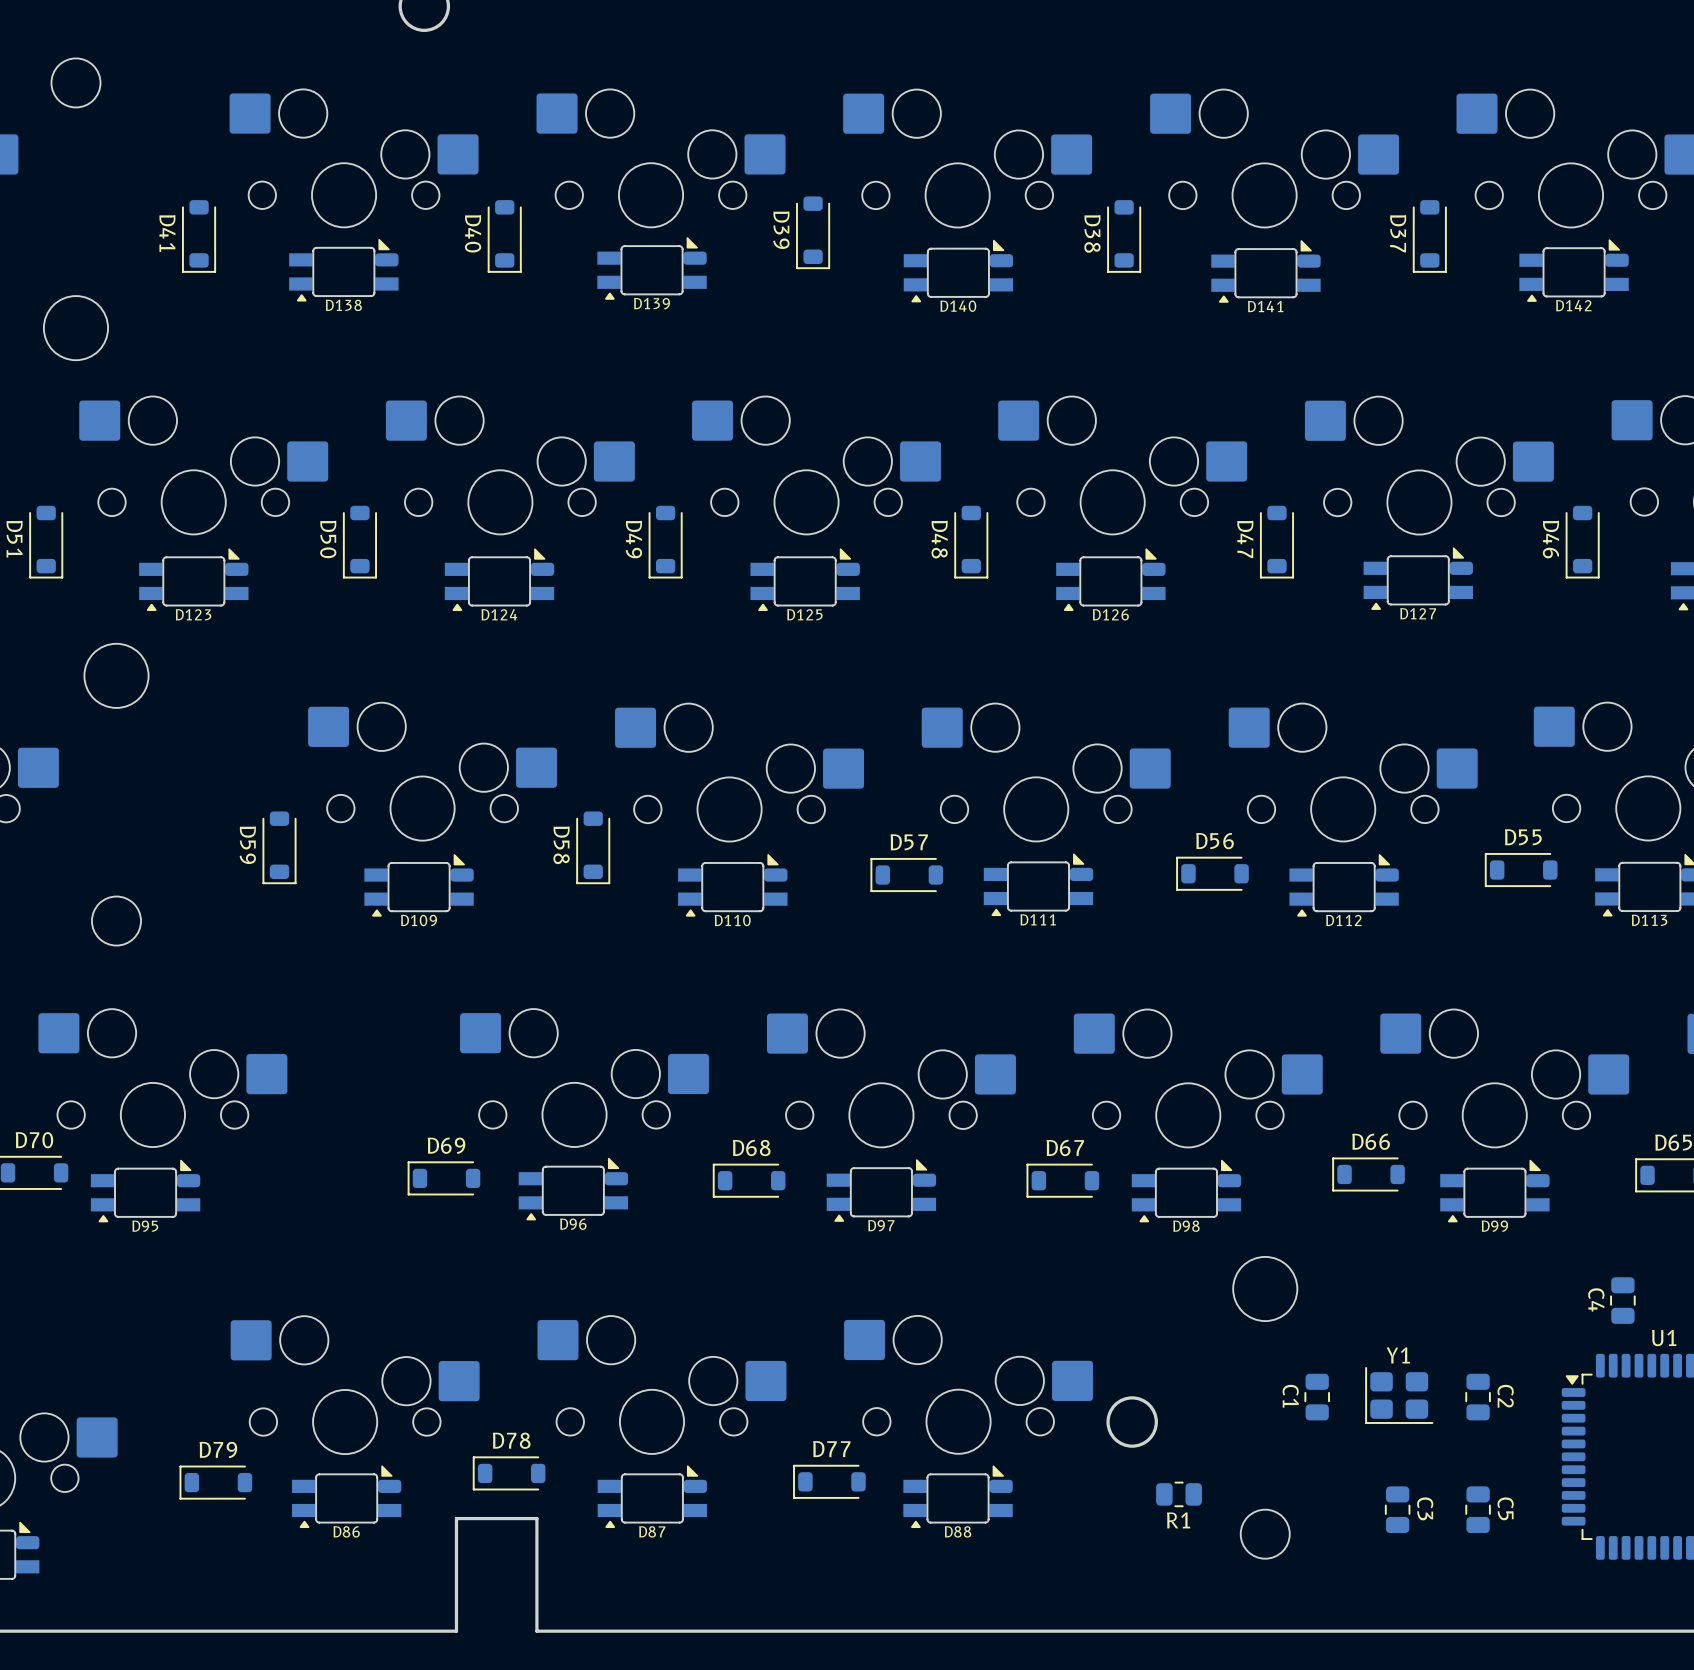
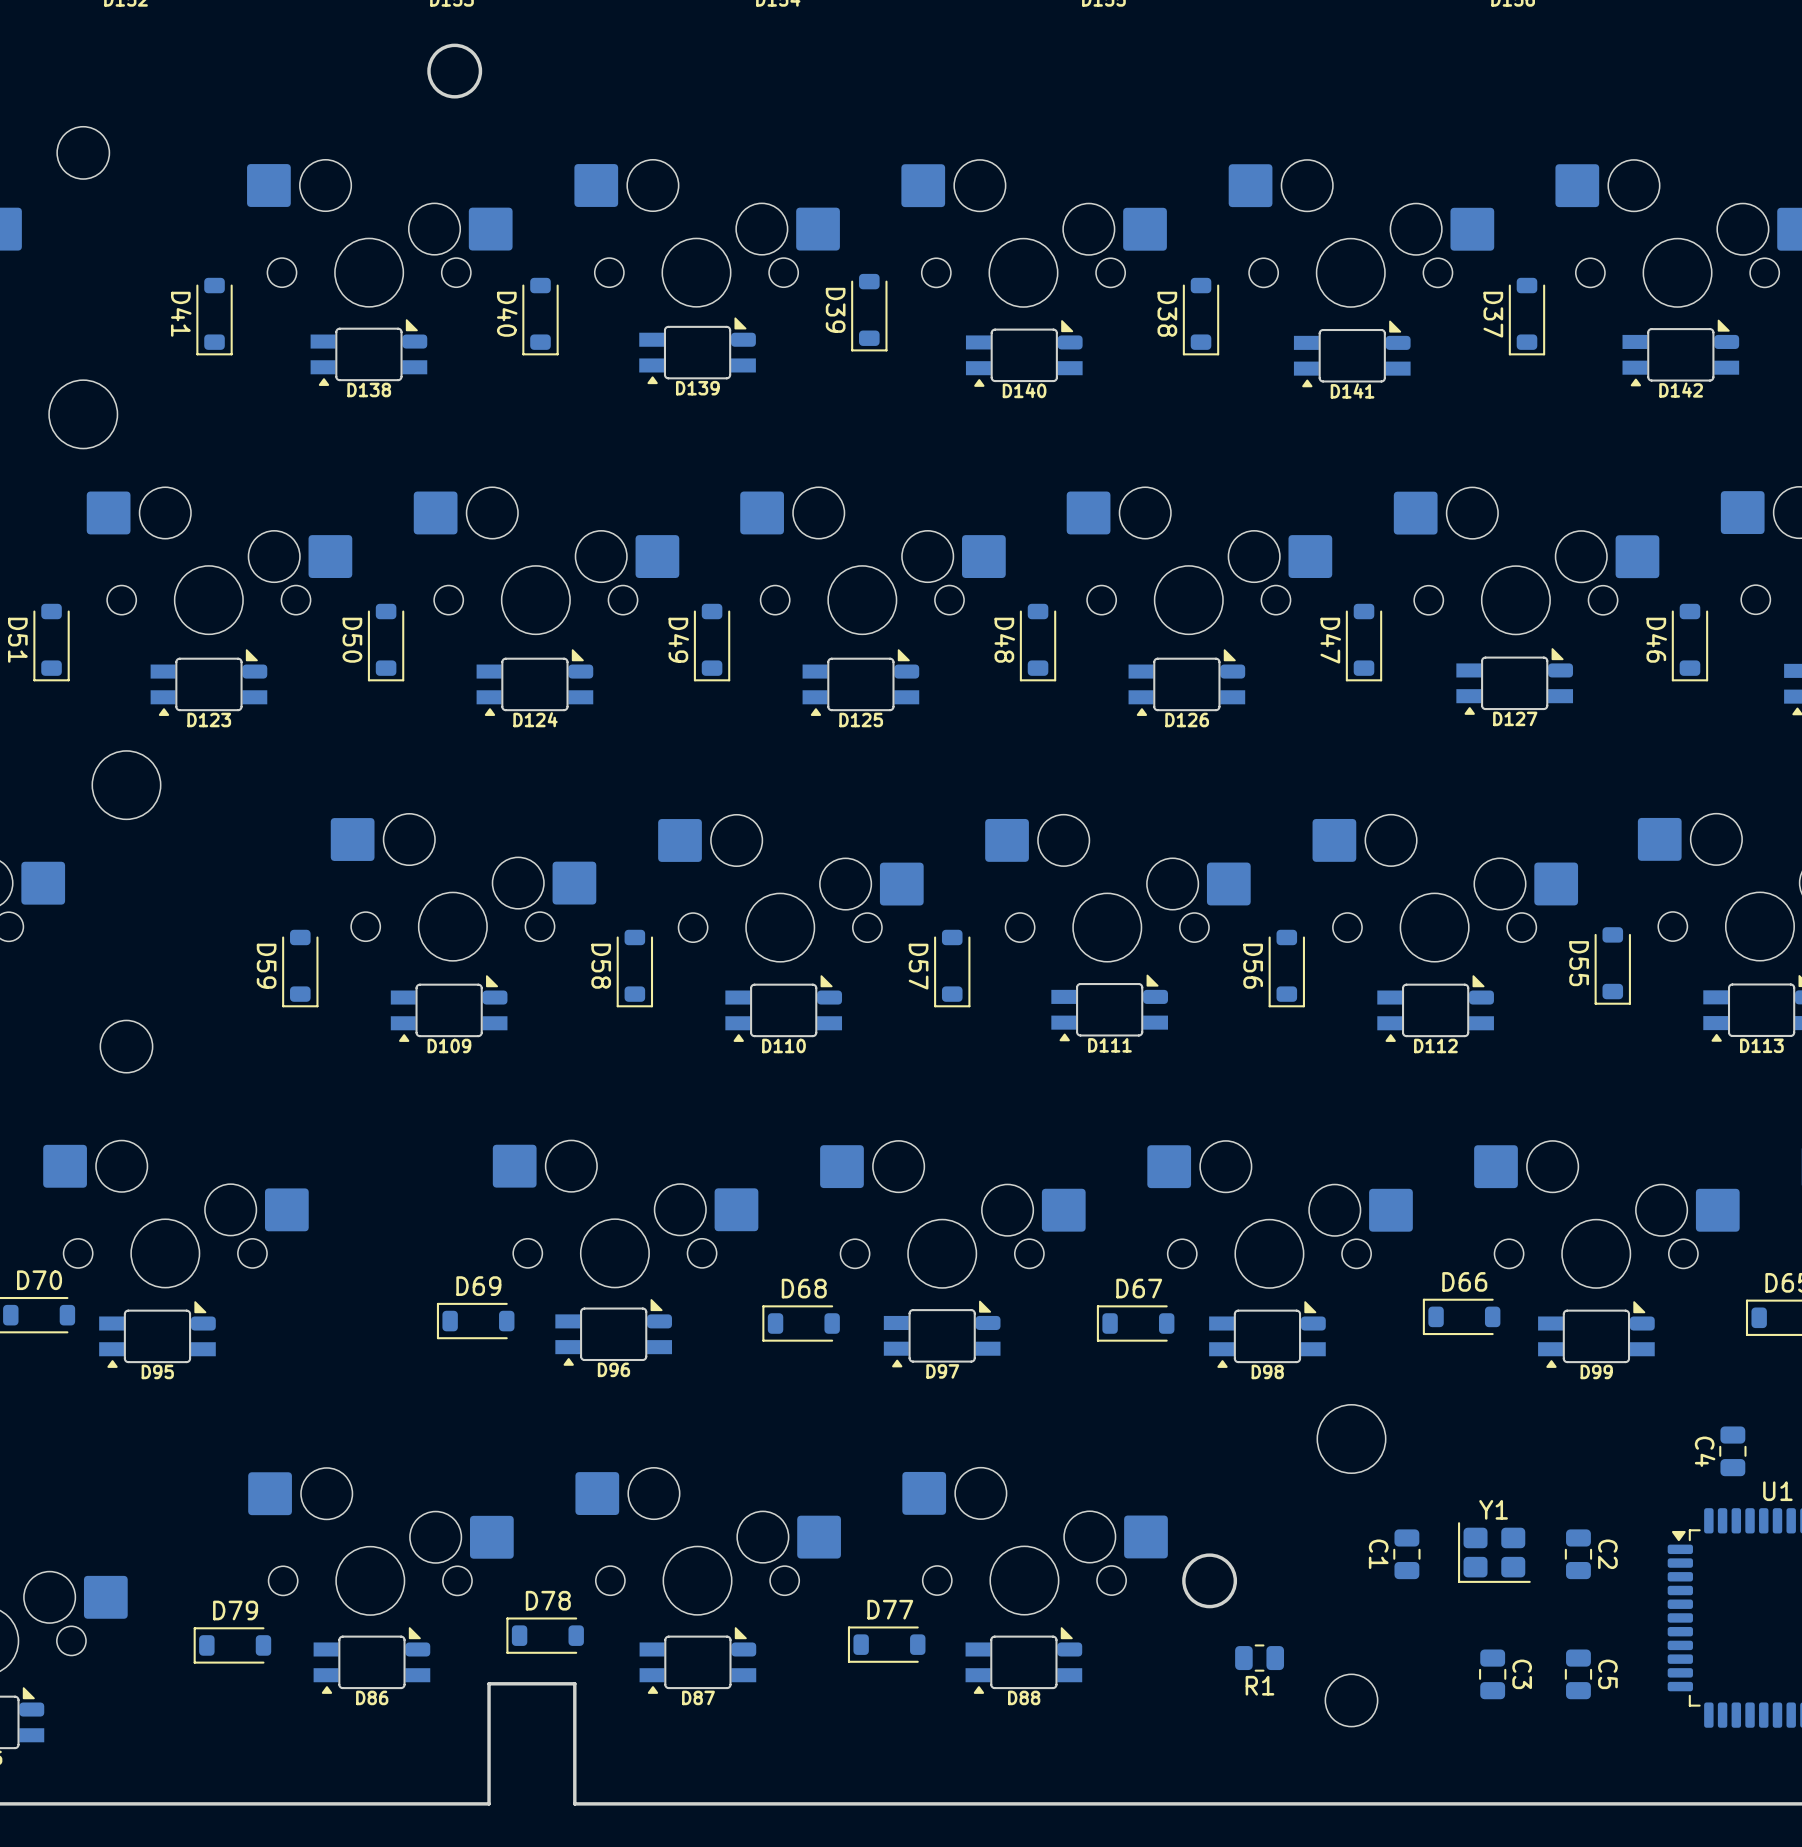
D55 rotation: 0° (1521, 870) -> 90° counterclockwise (1612, 965)
D56 rotation: 0° (1212, 873) -> 90° counterclockwise (1286, 968)
D57 rotation: 0° (906, 875) -> 90° counterclockwise (952, 968)

